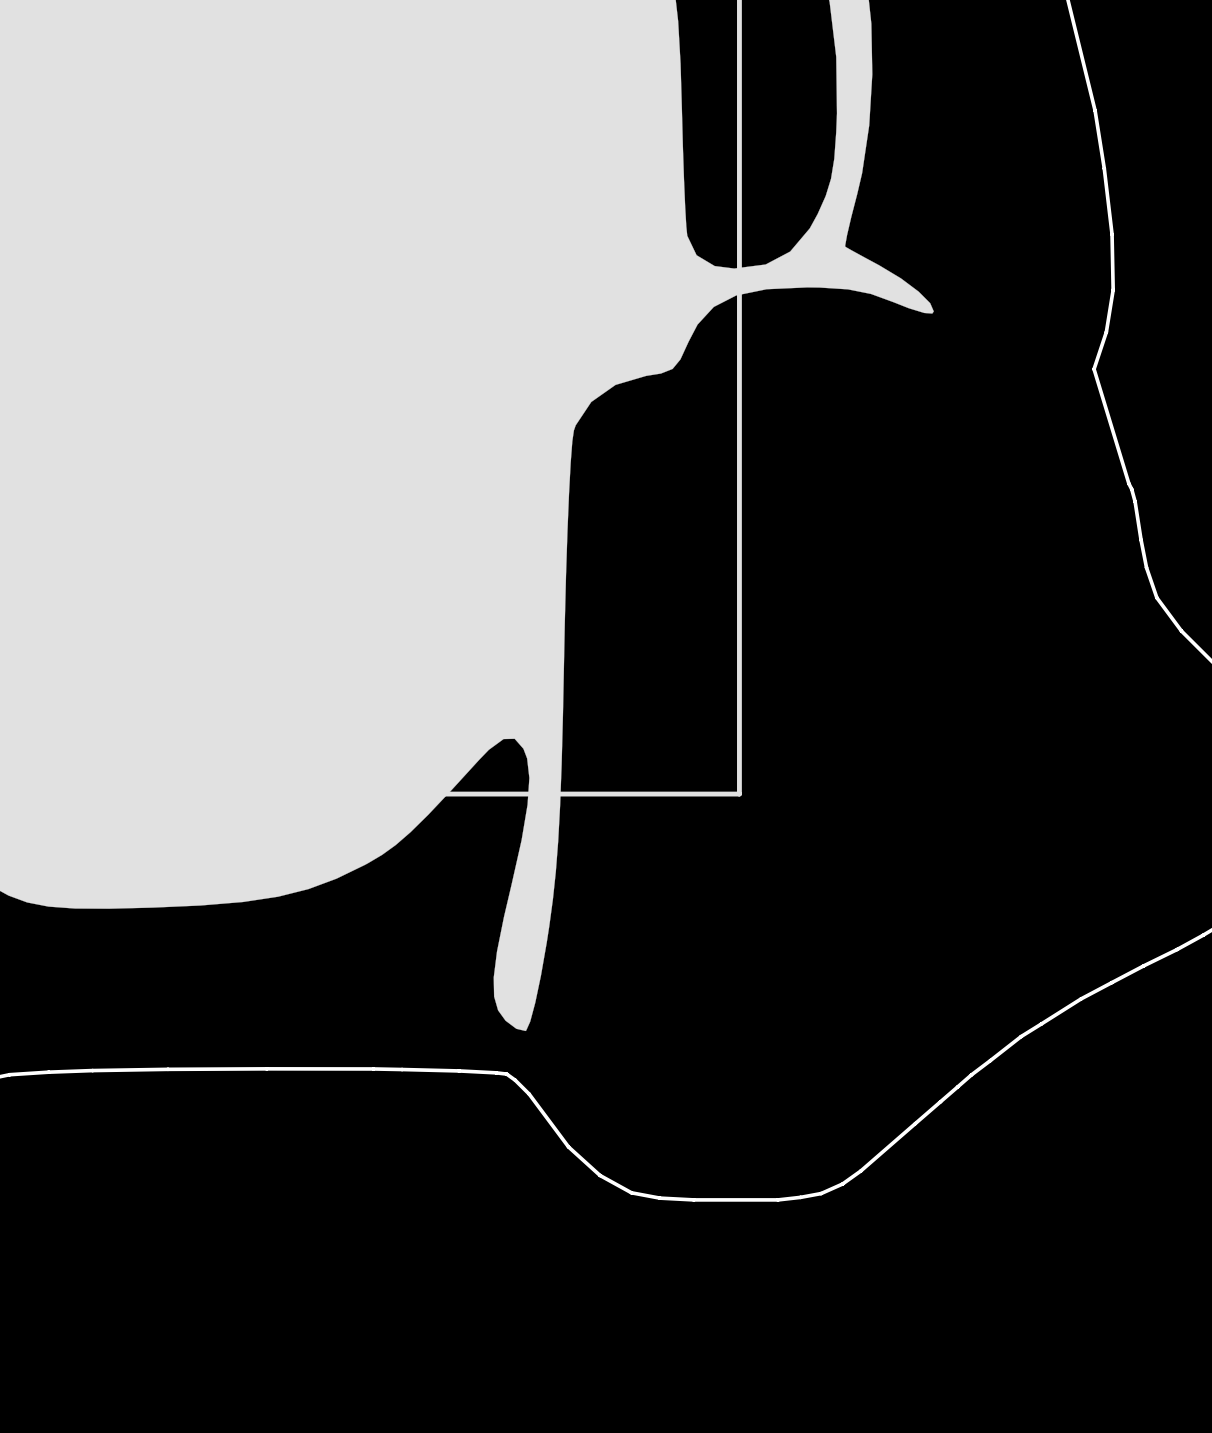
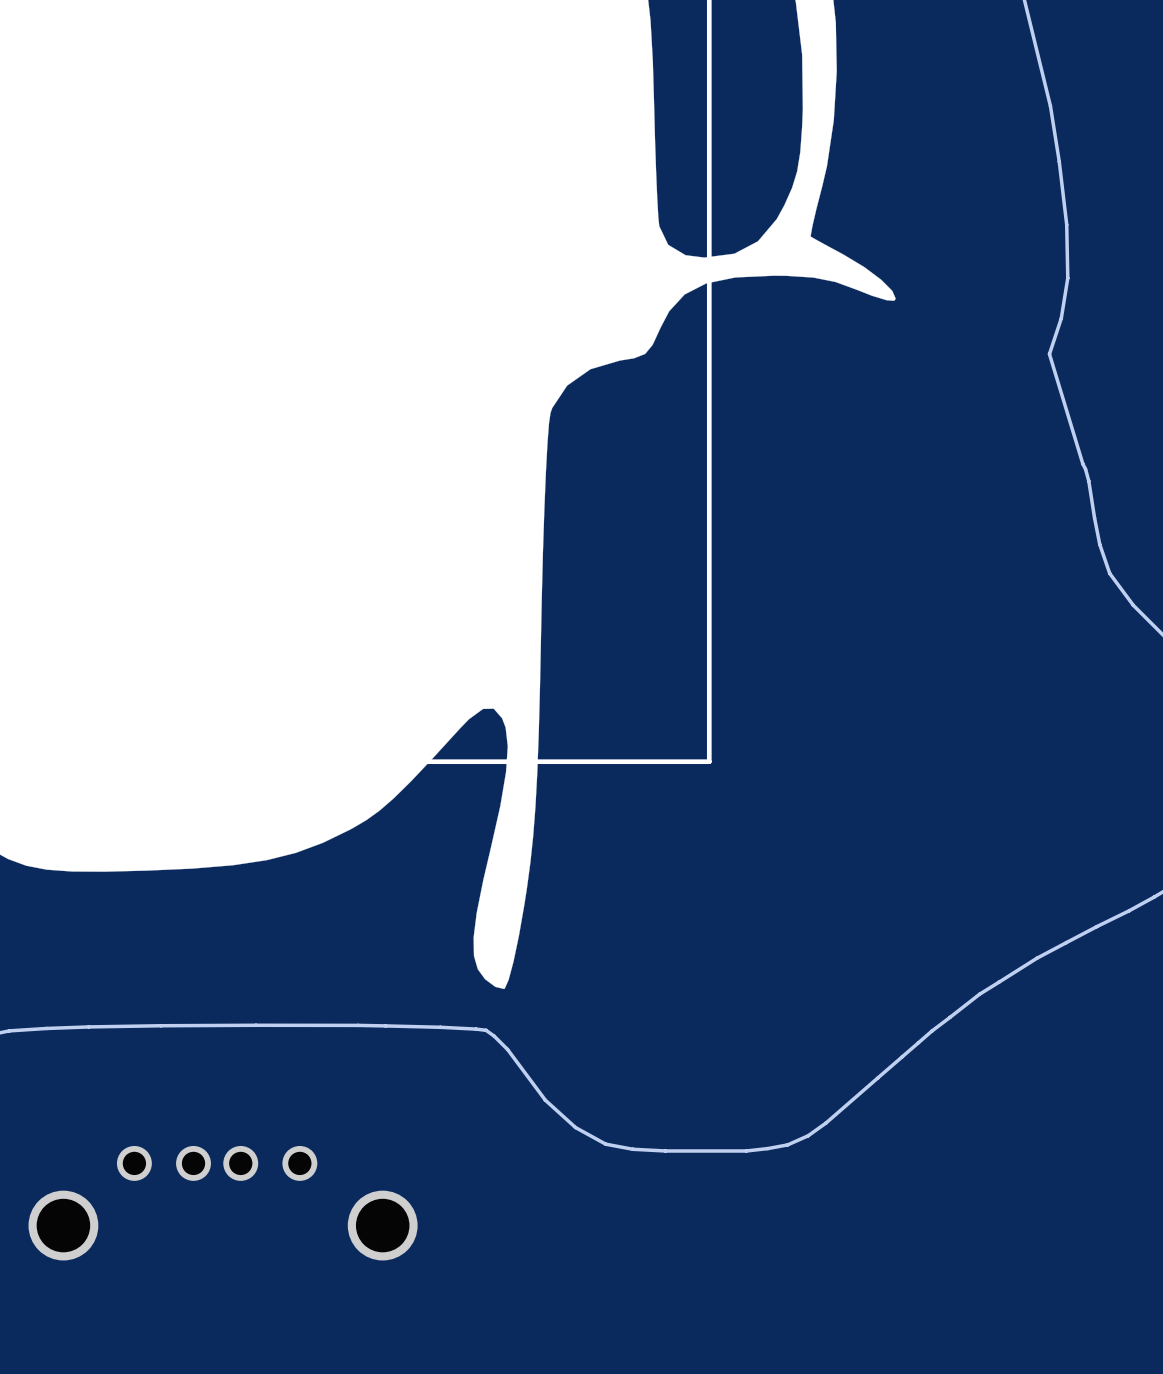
part: none -> (223, 1203)

